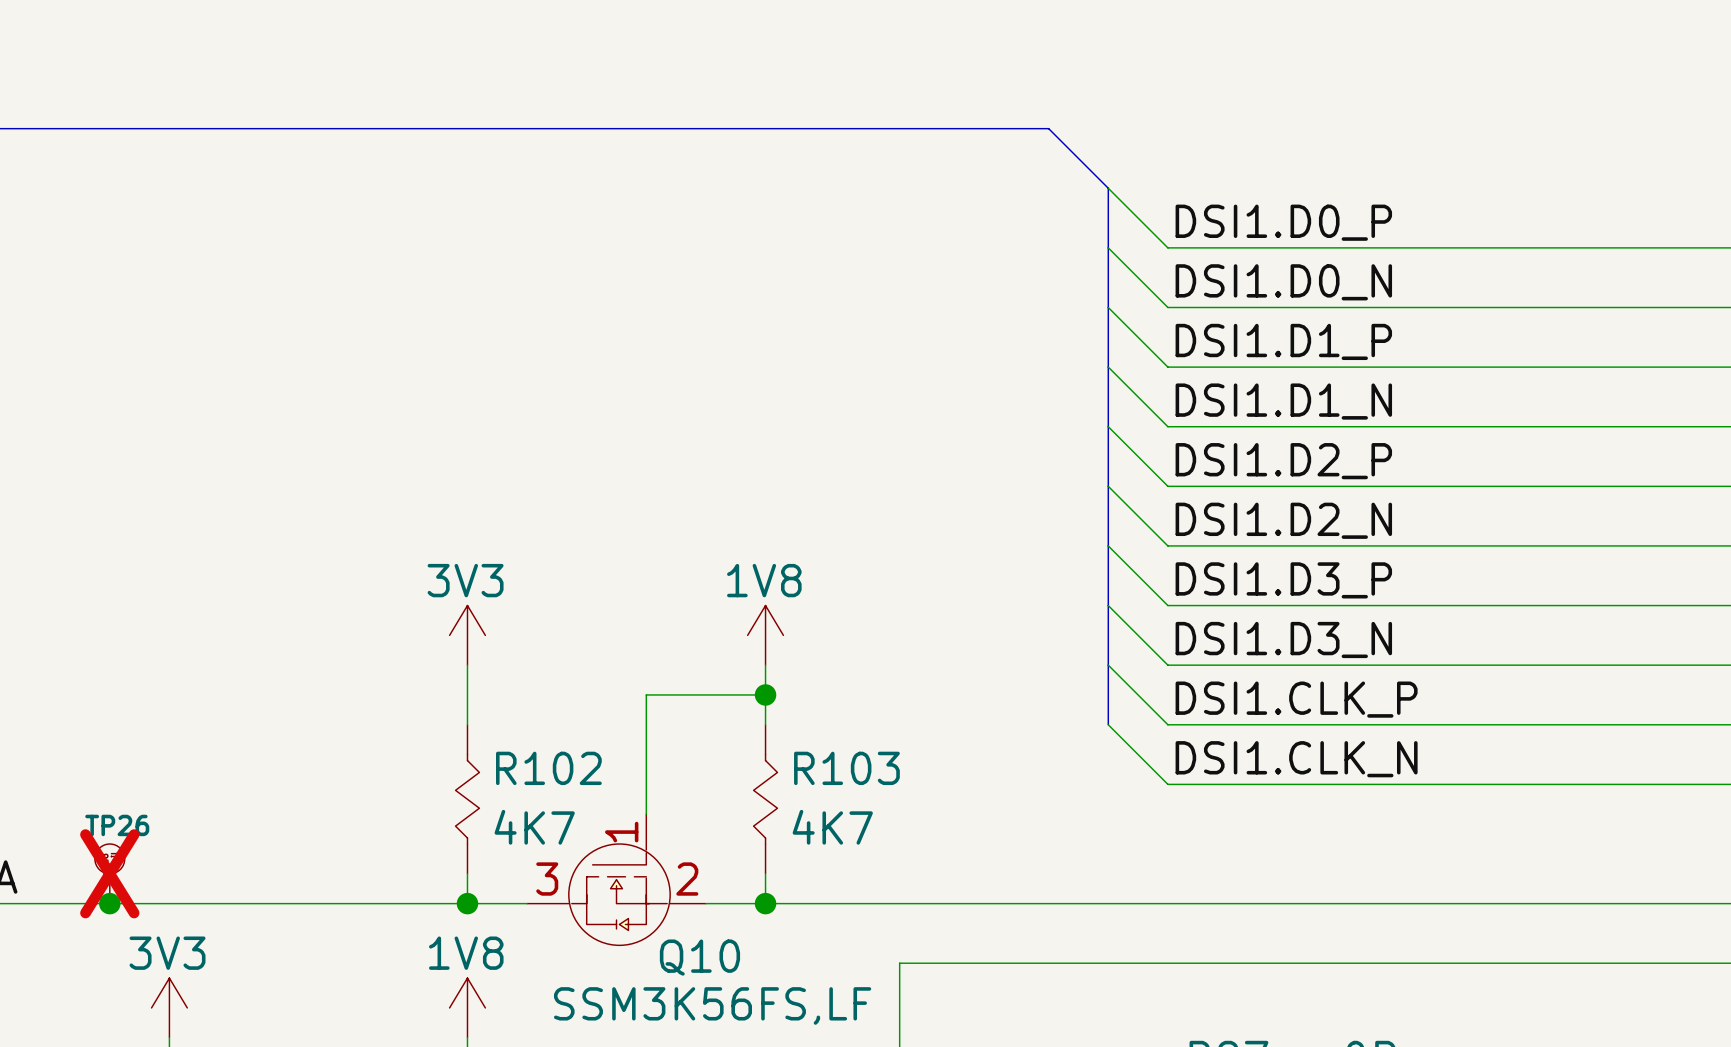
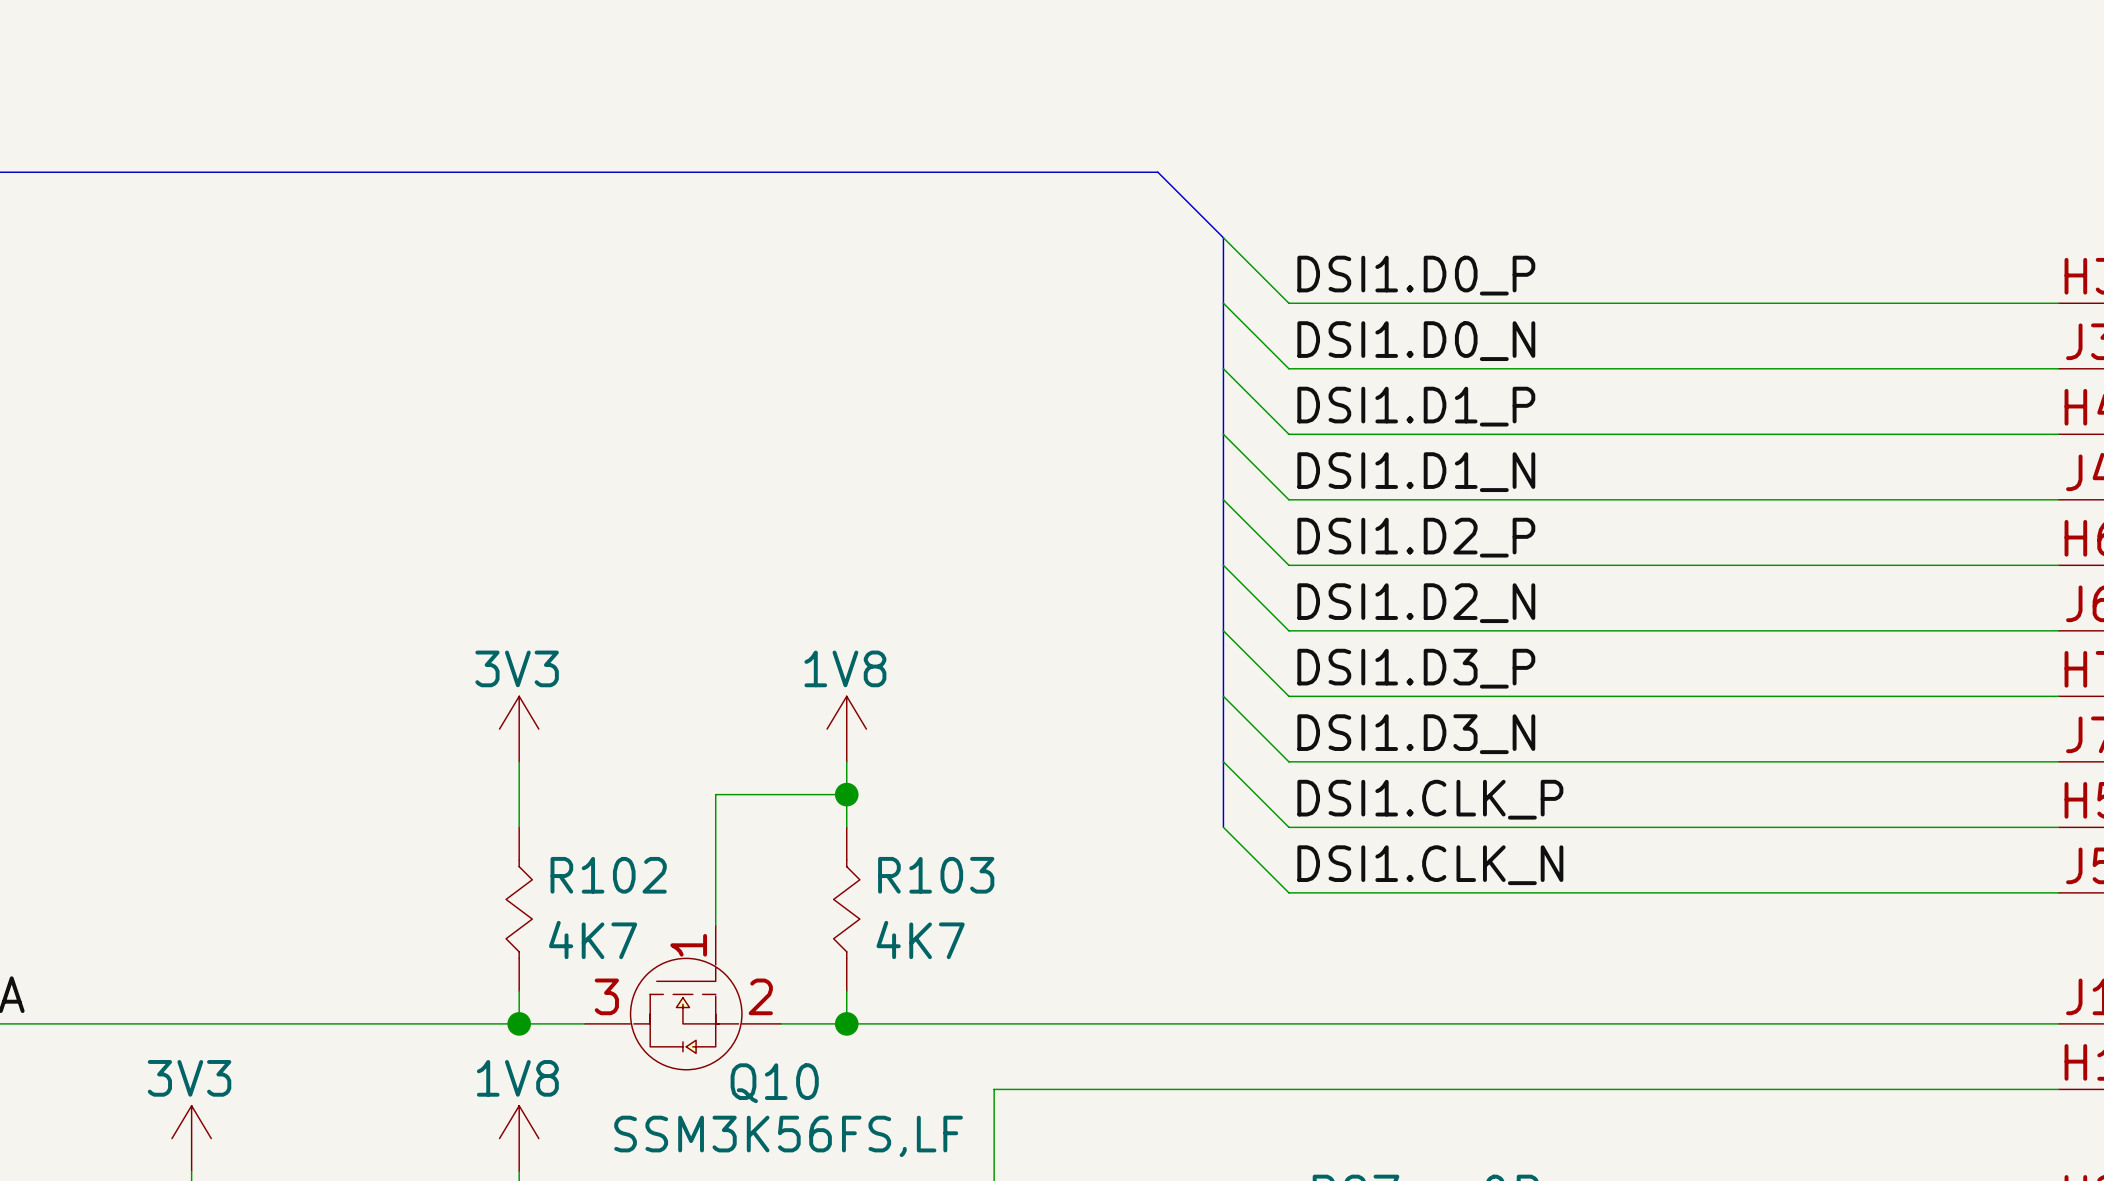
TP26: (109, 873) -> none
junction: (109, 903) -> none

